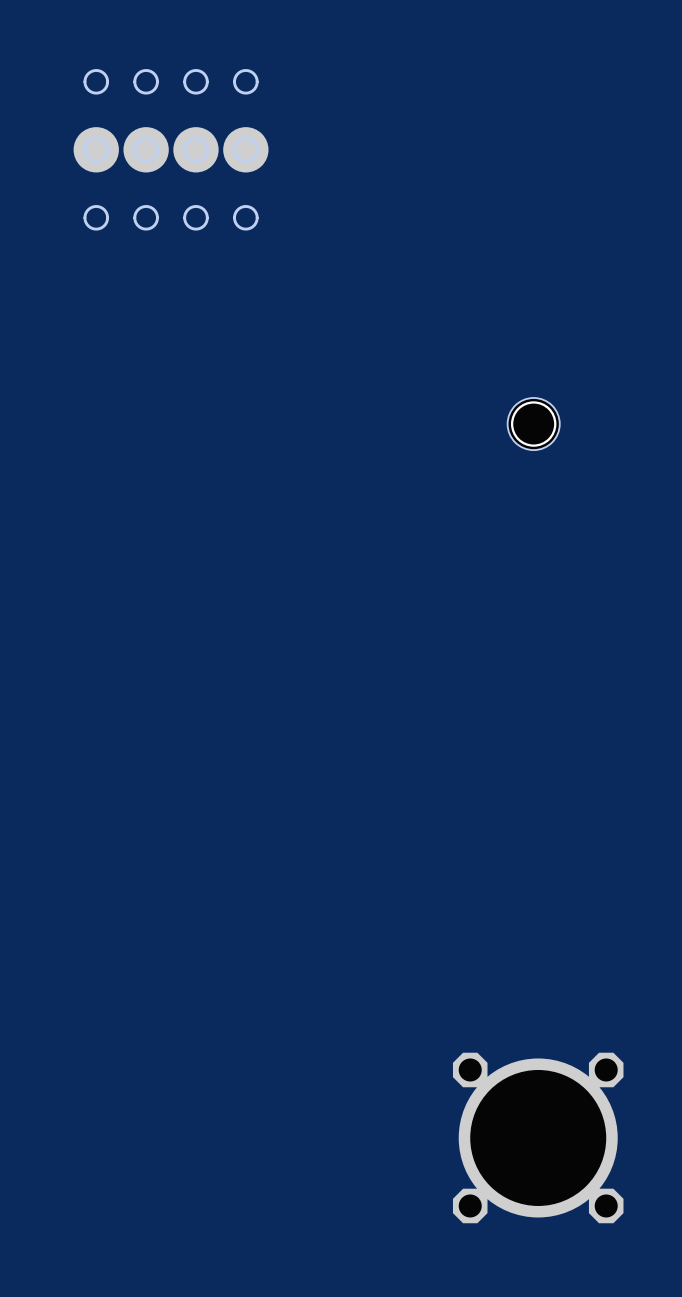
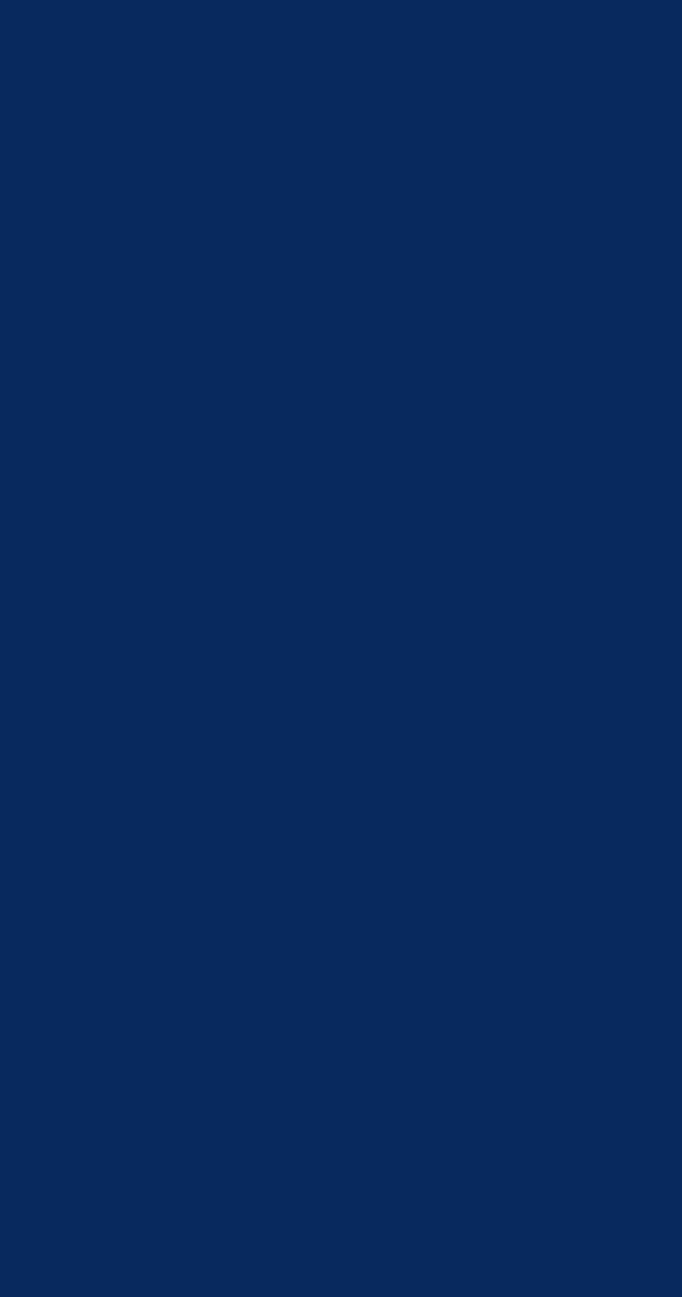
part: (96, 149) -> none
part: (146, 149) -> none
part: (195, 149) -> none
part: (245, 149) -> none
part: (533, 424) -> none
part: (538, 1137) -> none

